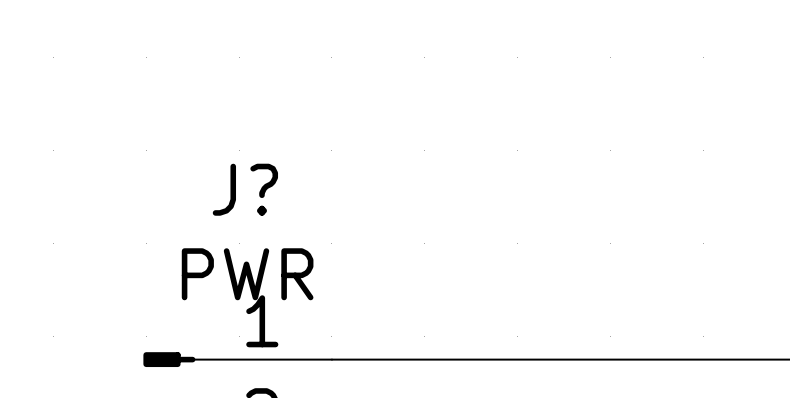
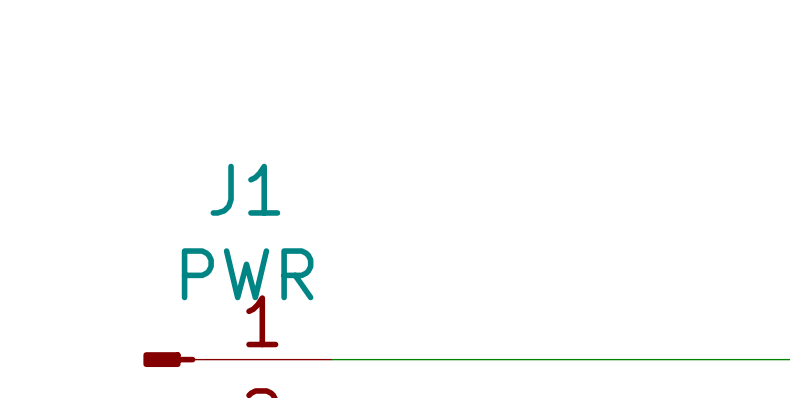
J? name: J? (245, 189) -> J1 (245, 189)

